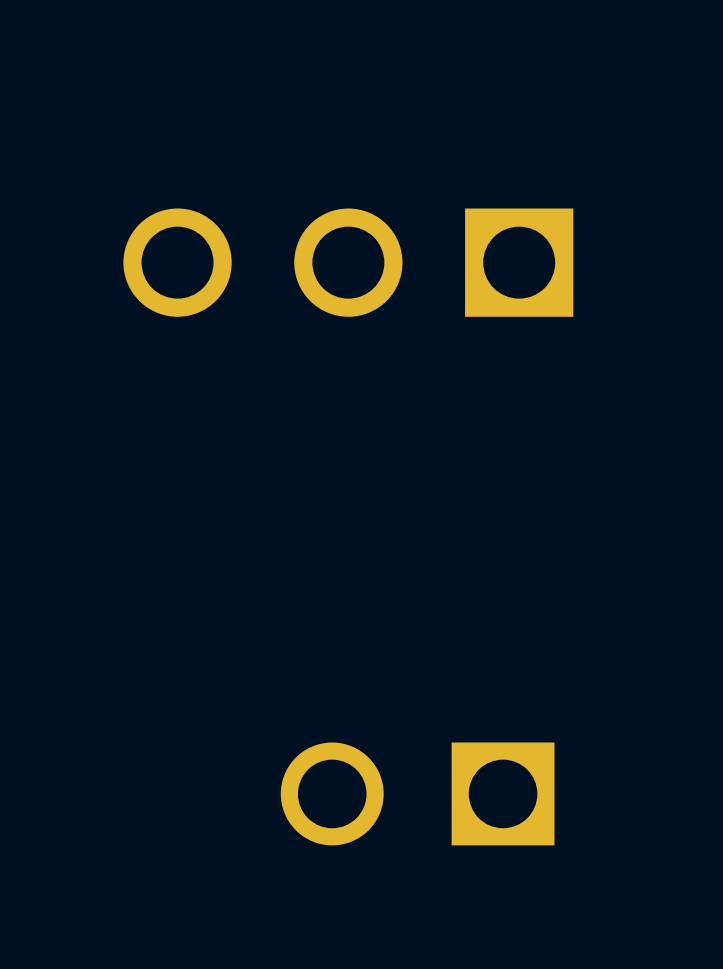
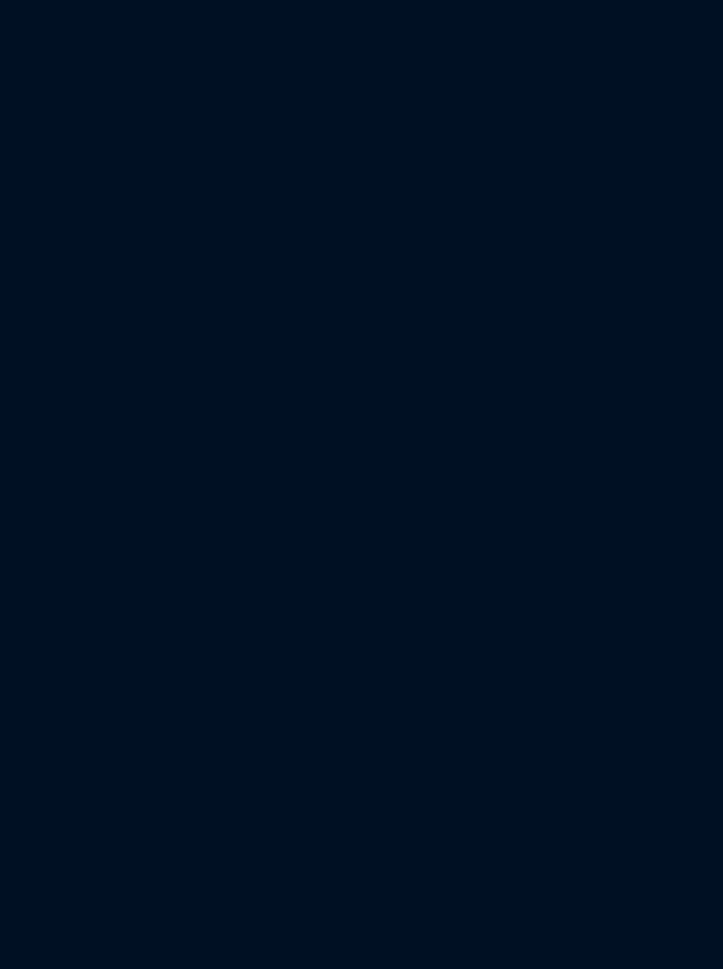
part: (348, 262) -> none
part: (417, 793) -> none

